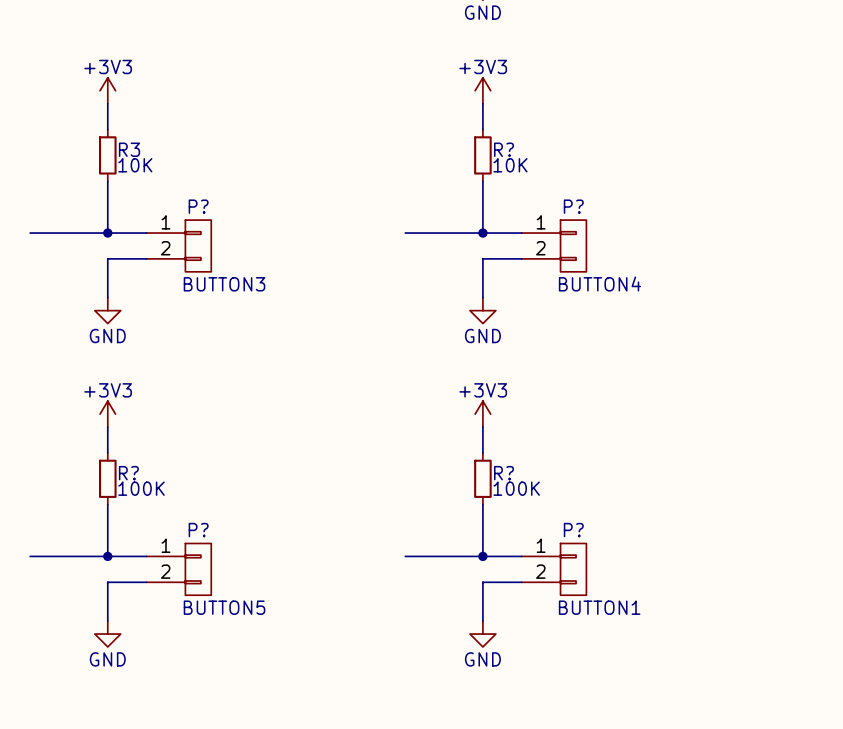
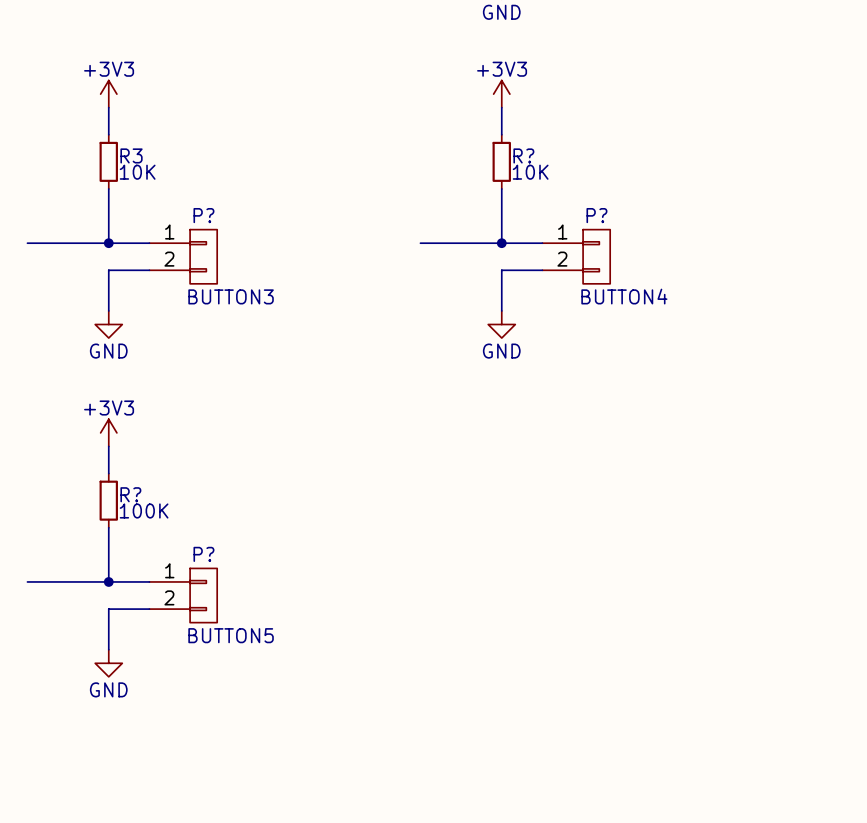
power symbol: +3V3 (482, 414) -> none
wire: (482, 427) (482, 452) -> none
R?: 100K (482, 478) -> none
wire: (482, 504) (482, 556) -> none
wire: (405, 556) (521, 556) -> none
junction: (482, 556) -> none
P?: BUTTON1 (554, 569) -> none
wire: (521, 582) (482, 582) (482, 621) -> none
power symbol: GND (482, 634) -> none

